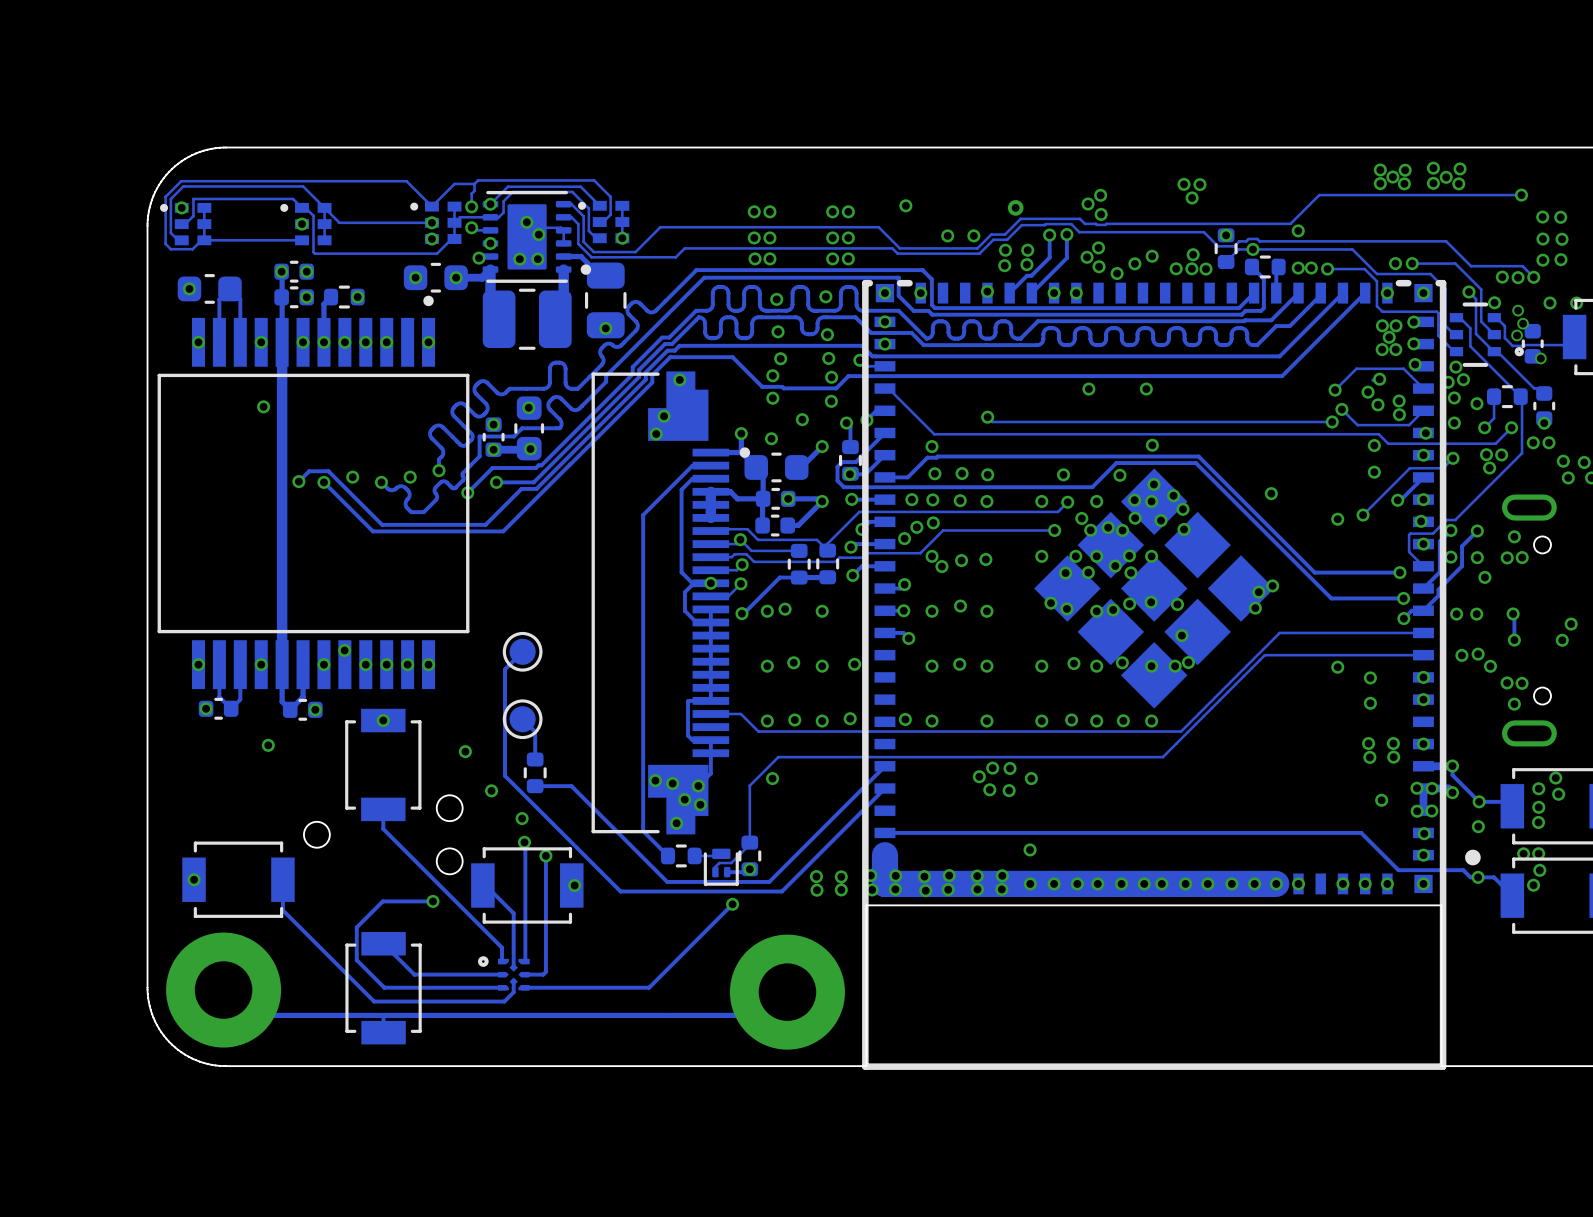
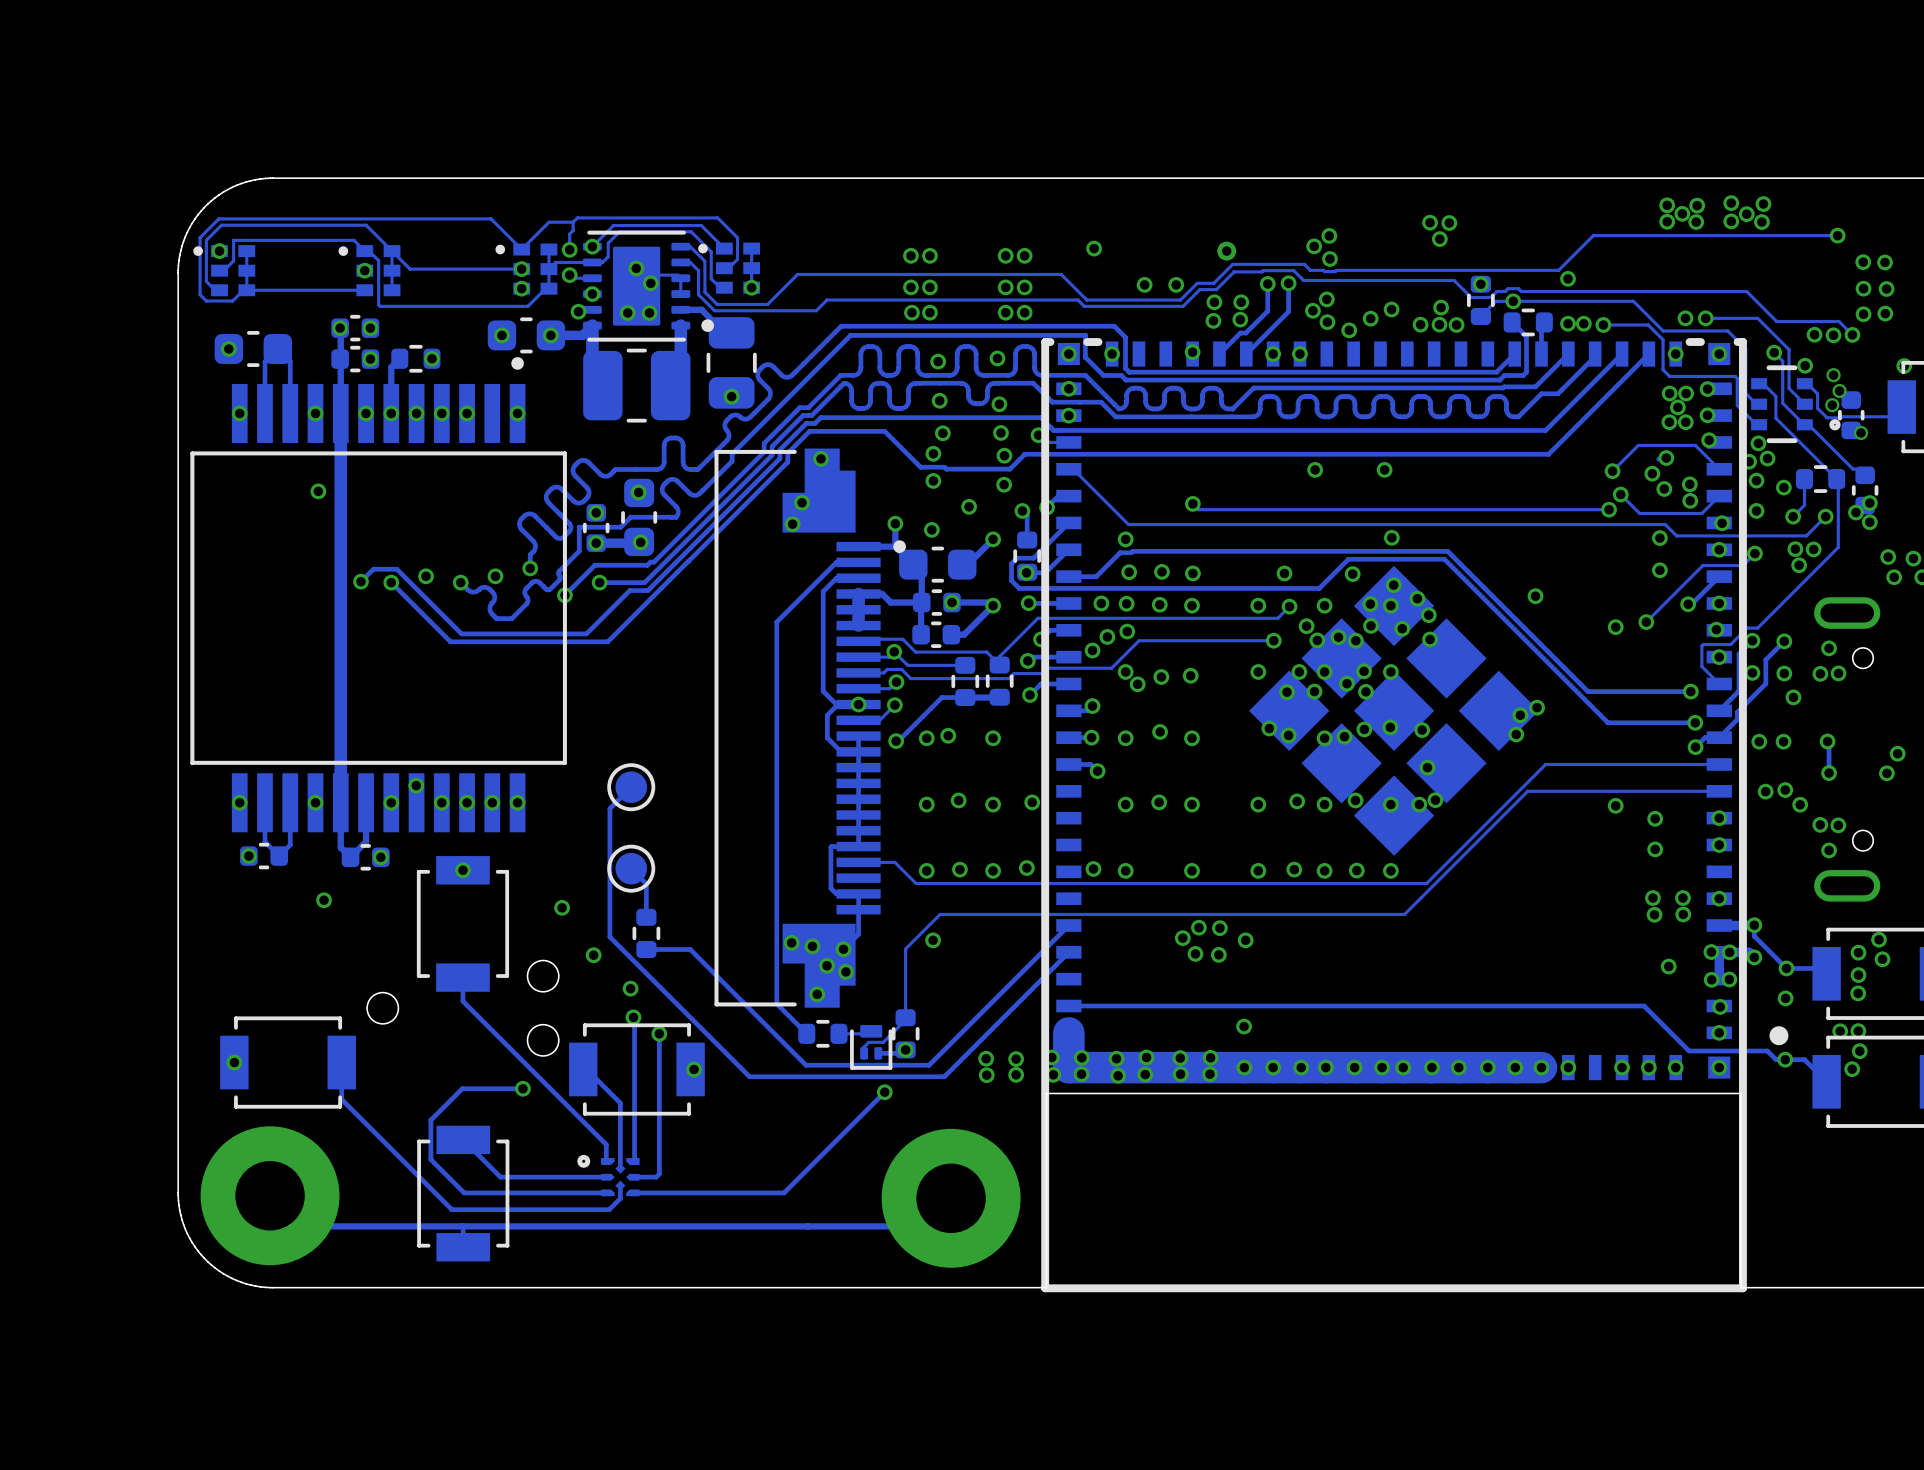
via: (1550, 303) -> none
via: none -> (1869, 503)
via: (1544, 423) -> none
via: none -> (1855, 512)
via: none -> (1869, 522)
via: (1533, 442) -> none
via: (1548, 442) -> none

